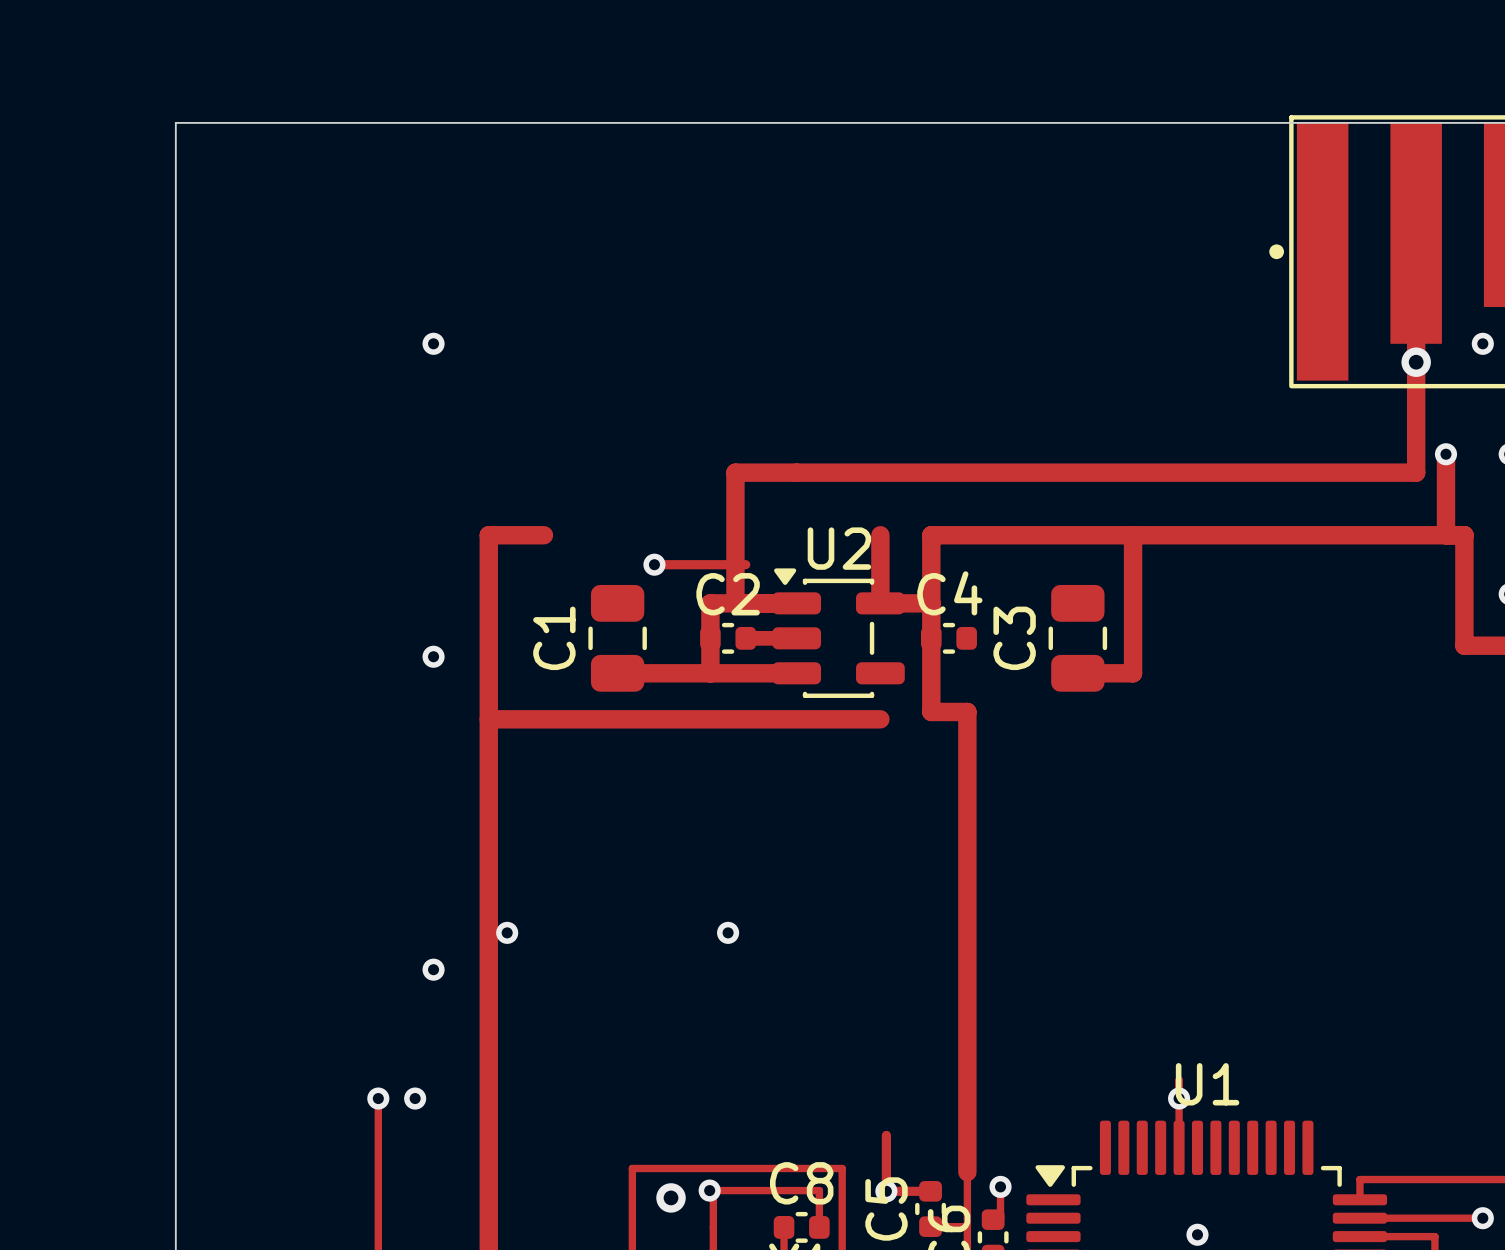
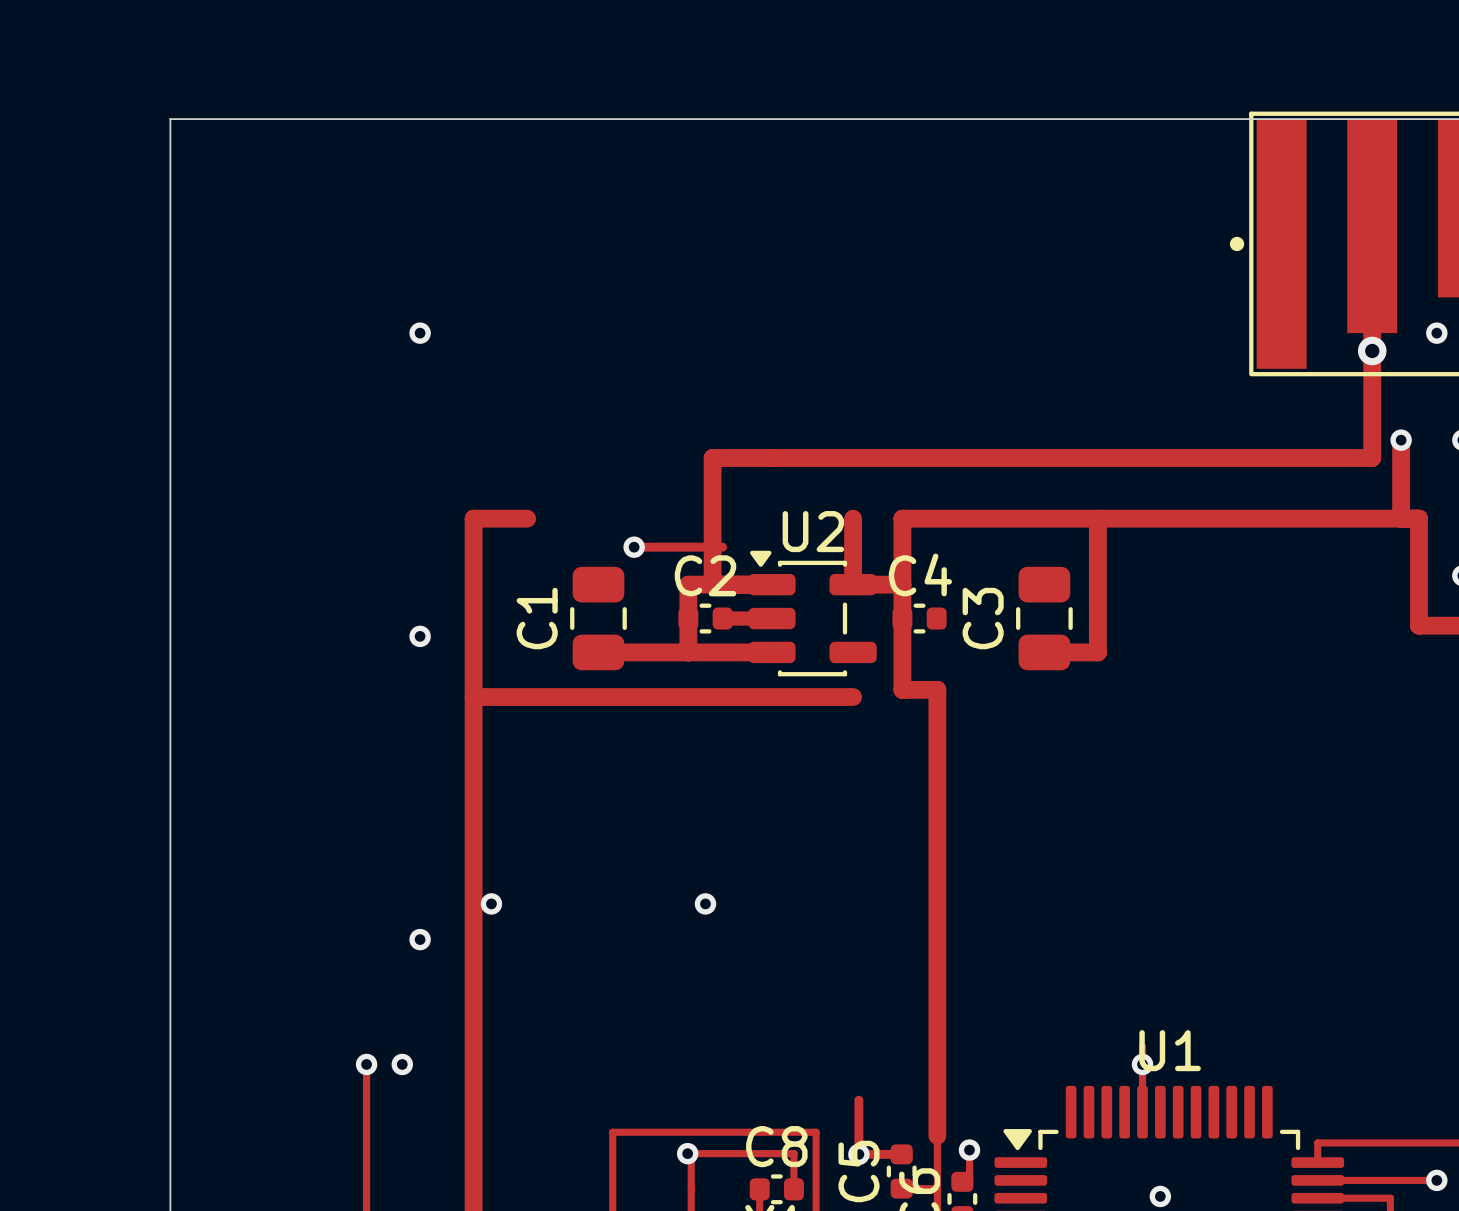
via: (671, 1197) -> none

